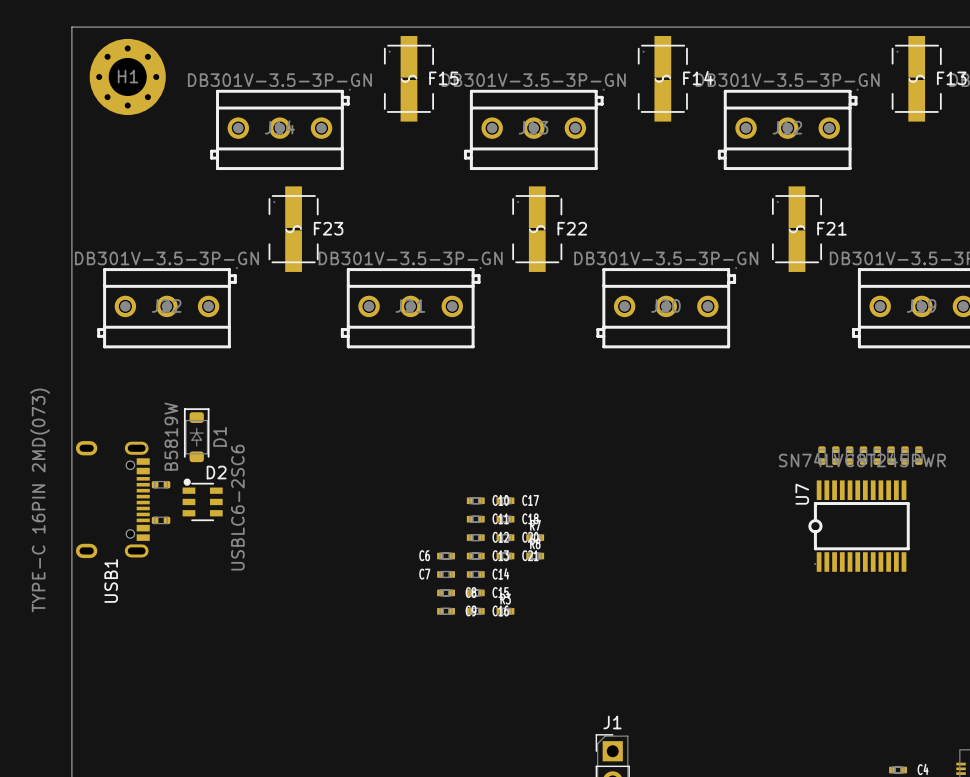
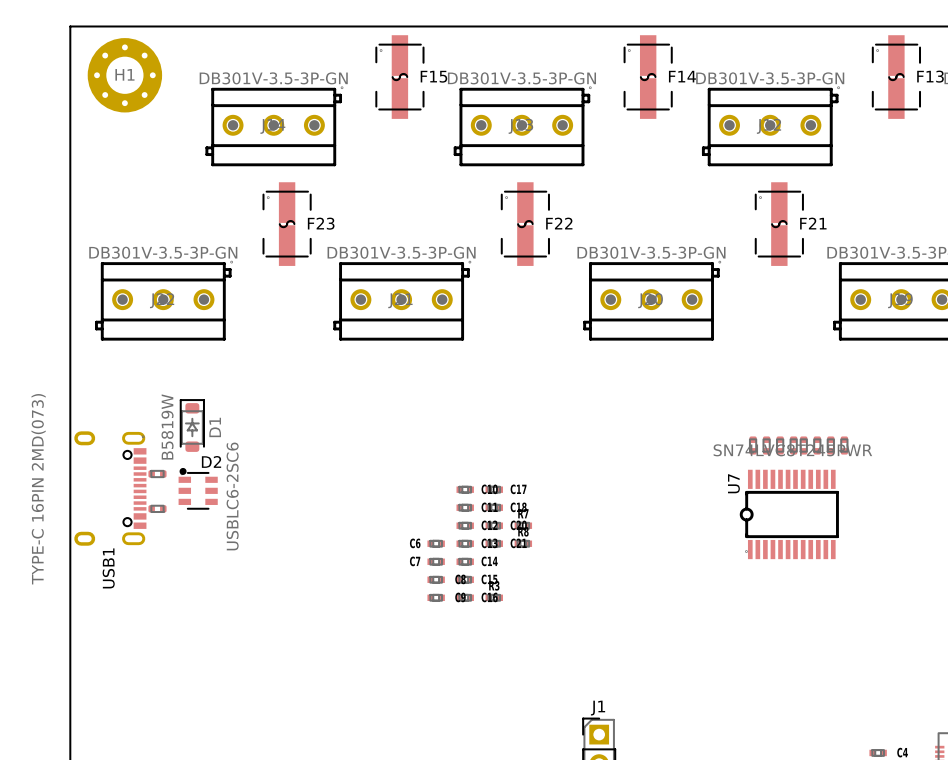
part: none -> (753, 445)
part: none -> (766, 445)
part: none -> (780, 445)
part: none -> (793, 445)
part: (877, 455) -> none
part: (891, 455) -> none
part: (905, 455) -> none
part: (918, 455) -> none
U7 position: (859, 526) -> (789, 514)

